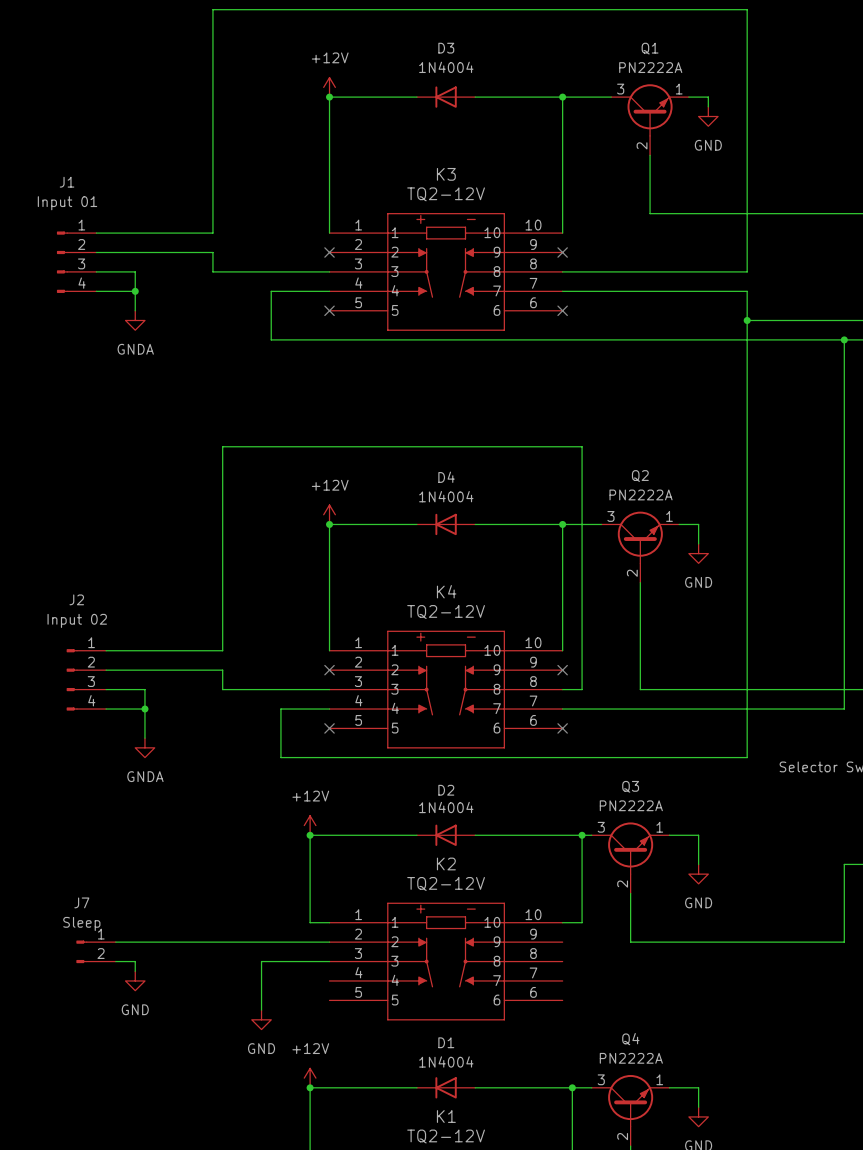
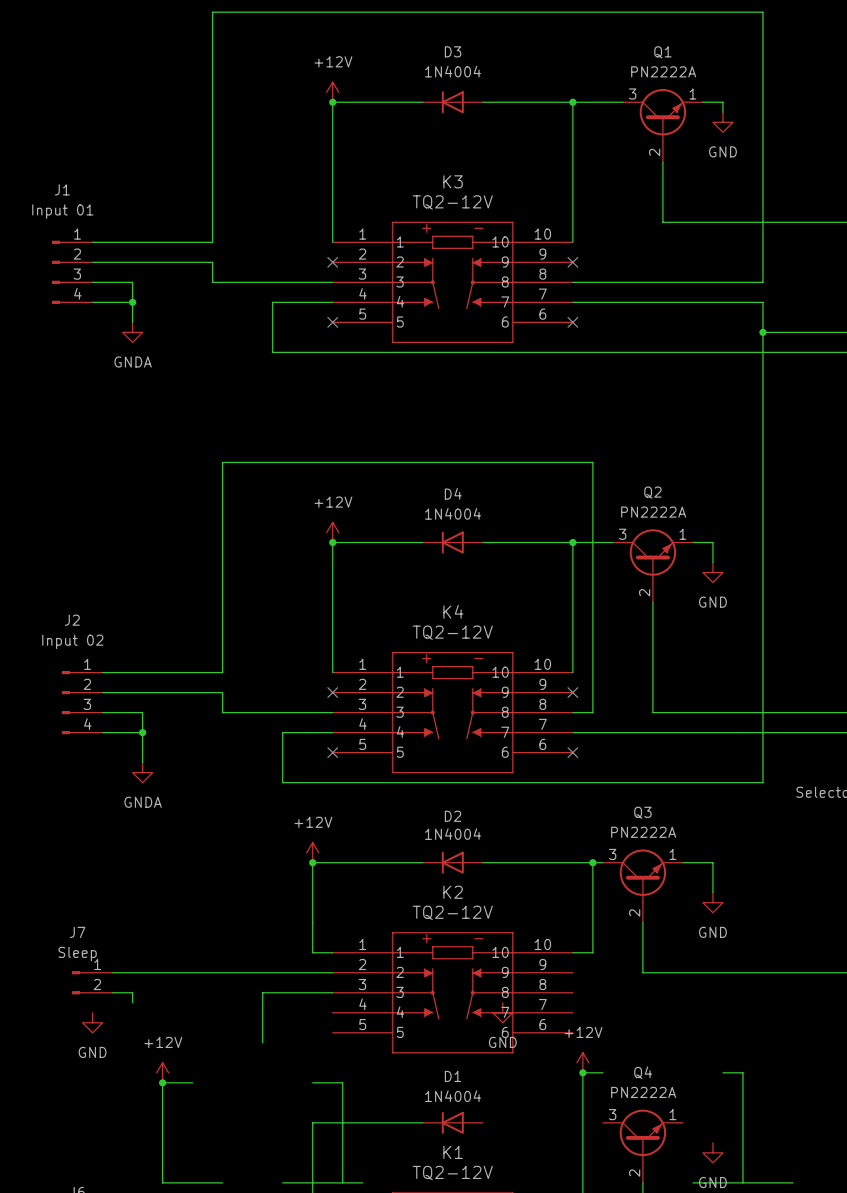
power symbol position: GND (135, 980) -> GND (92, 1022)
power symbol: none -> GND (502, 1012)
power symbol: GND (261, 1019) -> none
power symbol: none -> +12V (582, 1062)
power symbol: none -> +12V (162, 1072)
junction: none -> (582, 1072)
wire: none -> (602, 1072) (582, 1072) (582, 1122)
wire: none -> (722, 1072) (742, 1072) (742, 1182)
junction: none -> (162, 1082)
wire: none -> (192, 1082) (162, 1082) (162, 1182) (222, 1182)
wire: none -> (312, 1082) (342, 1082) (342, 1182)
power symbol: +12V (310, 1078) -> none
junction: (310, 1087) -> none
wire: (475, 1087) (591, 1087) -> none
junction: (572, 1087) -> none
wire: (669, 1087) (698, 1087) (698, 1107) -> none
wire: none -> (282, 1182) (362, 1182)
wire: none -> (692, 1182) (793, 1182)

